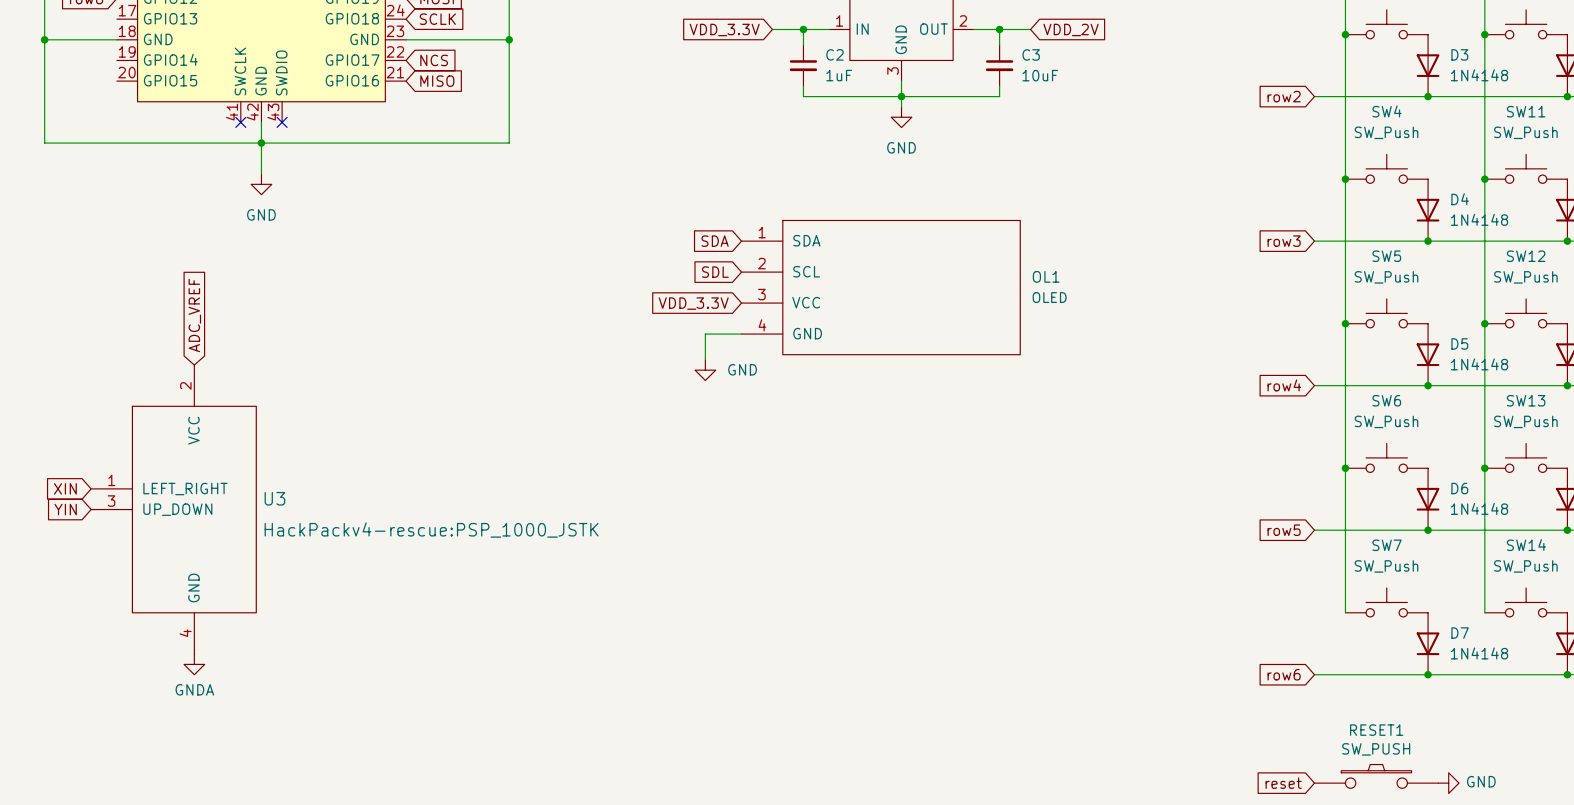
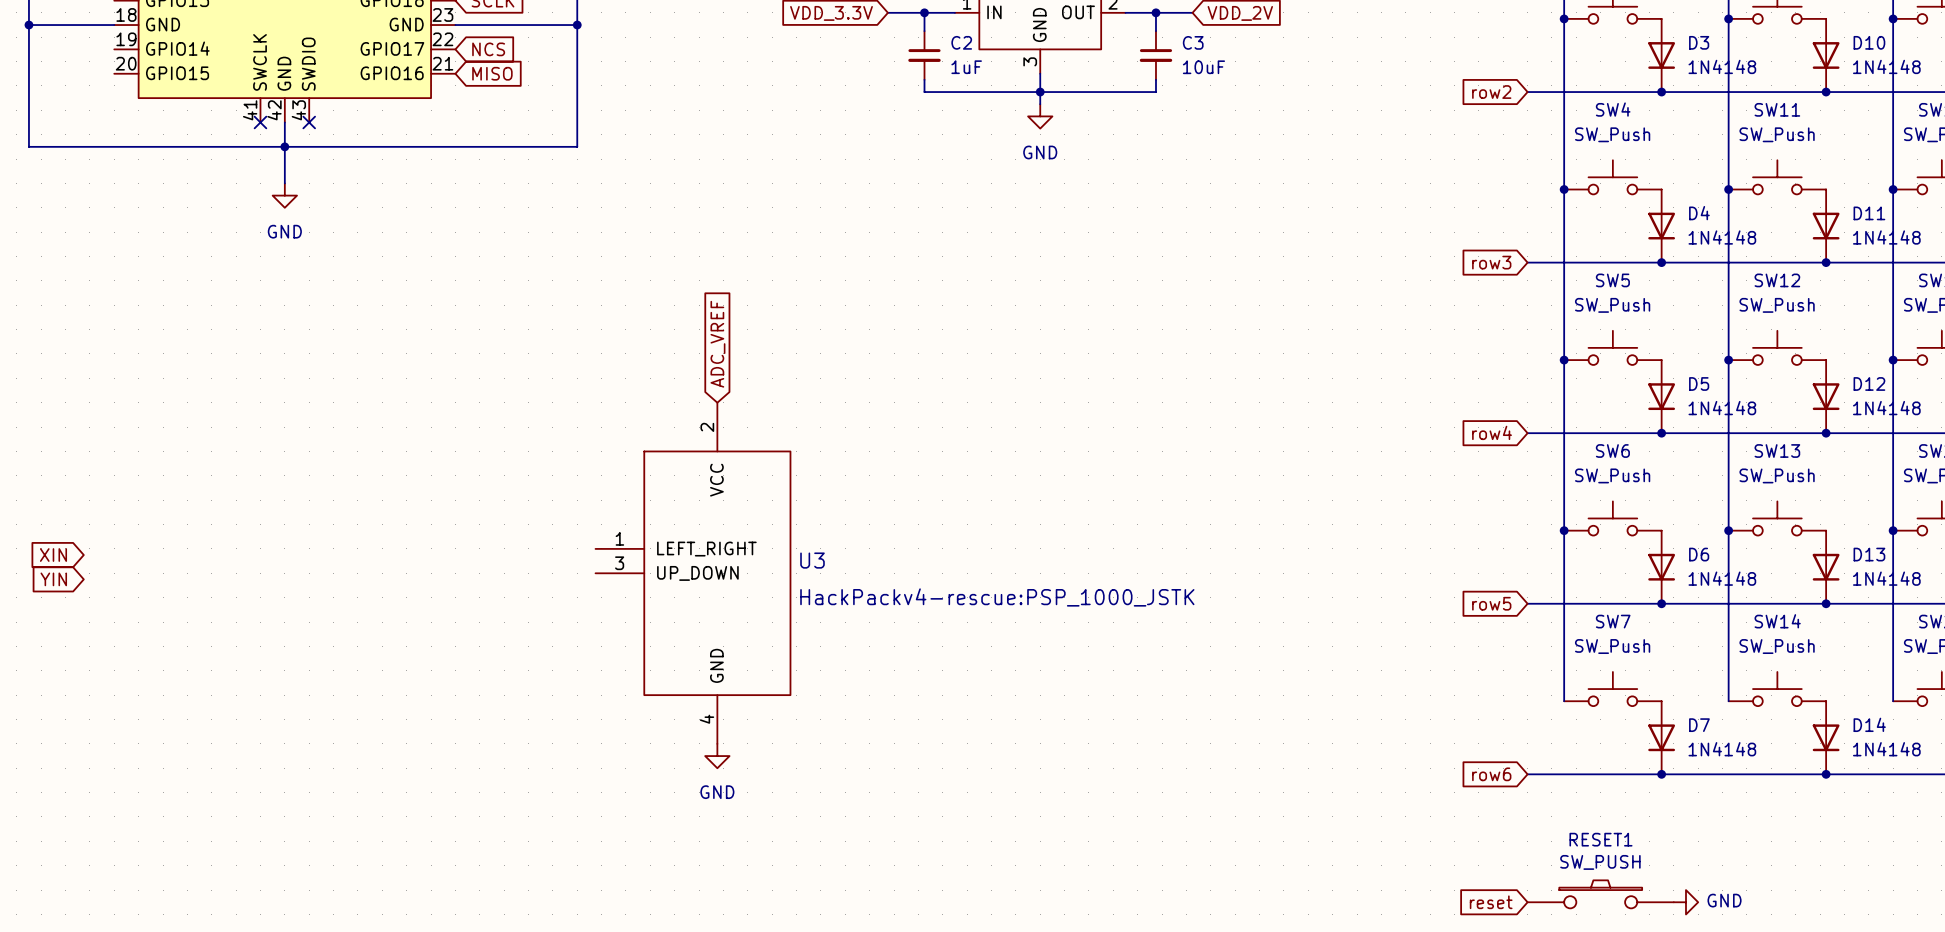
global label: SDA (715, 241) -> none
global label: SDL (715, 272) -> none
OL1: OLED (880, 287) -> none
global label: VDD_3.3V (693, 303) -> none
global label: none -> ADC_VREF (717, 344)
global label: ADC_VREF (194, 315) -> none
wire: (741, 334) (705, 334) (705, 359) -> none
power symbol: GND (705, 370) -> none
U3 position: (173, 509) -> (693, 573)
power symbol: none -> GND (717, 756)
power symbol: GNDA (194, 664) -> none

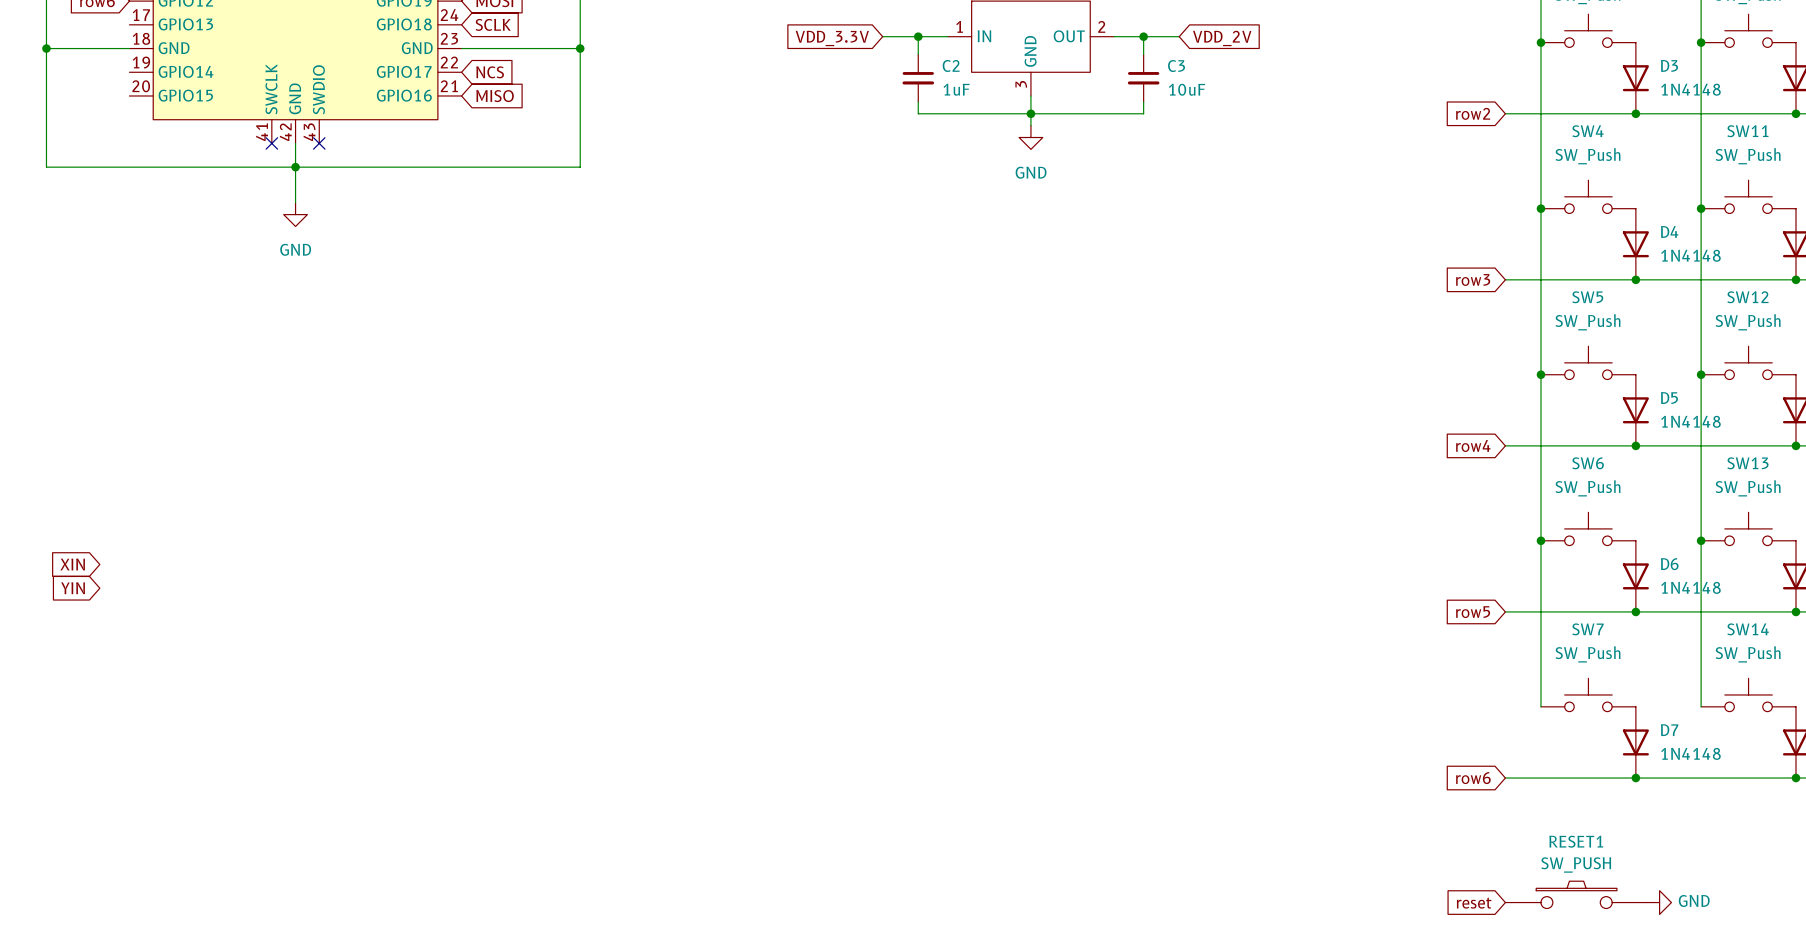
global label: ADC_VREF (717, 344) -> none
U3: HackPackv4-rescue:PSP_1000_JSTK (693, 573) -> none
power symbol: GND (717, 756) -> none

